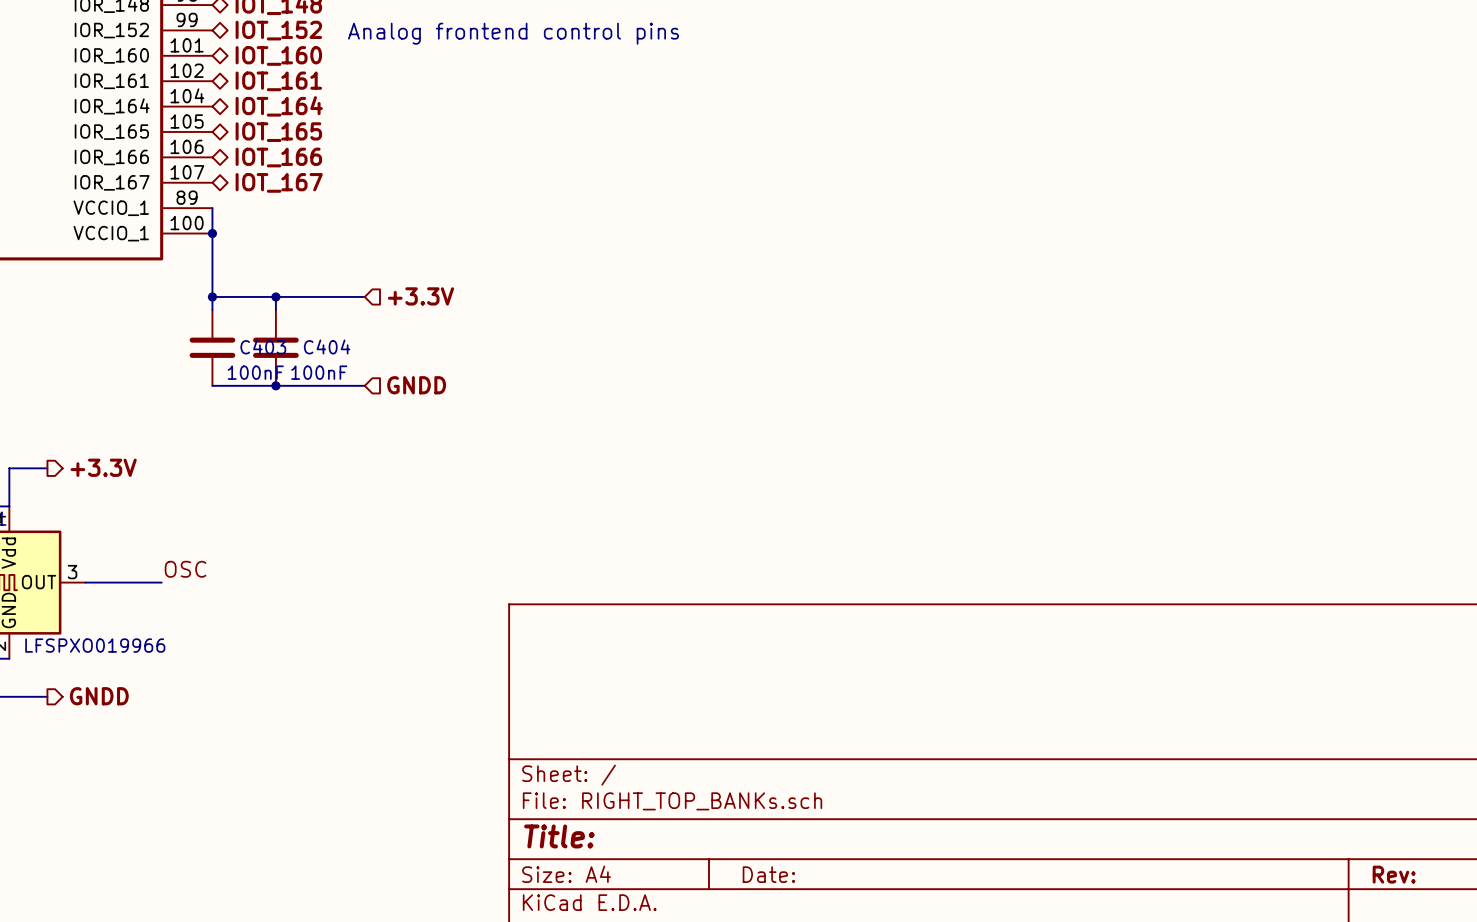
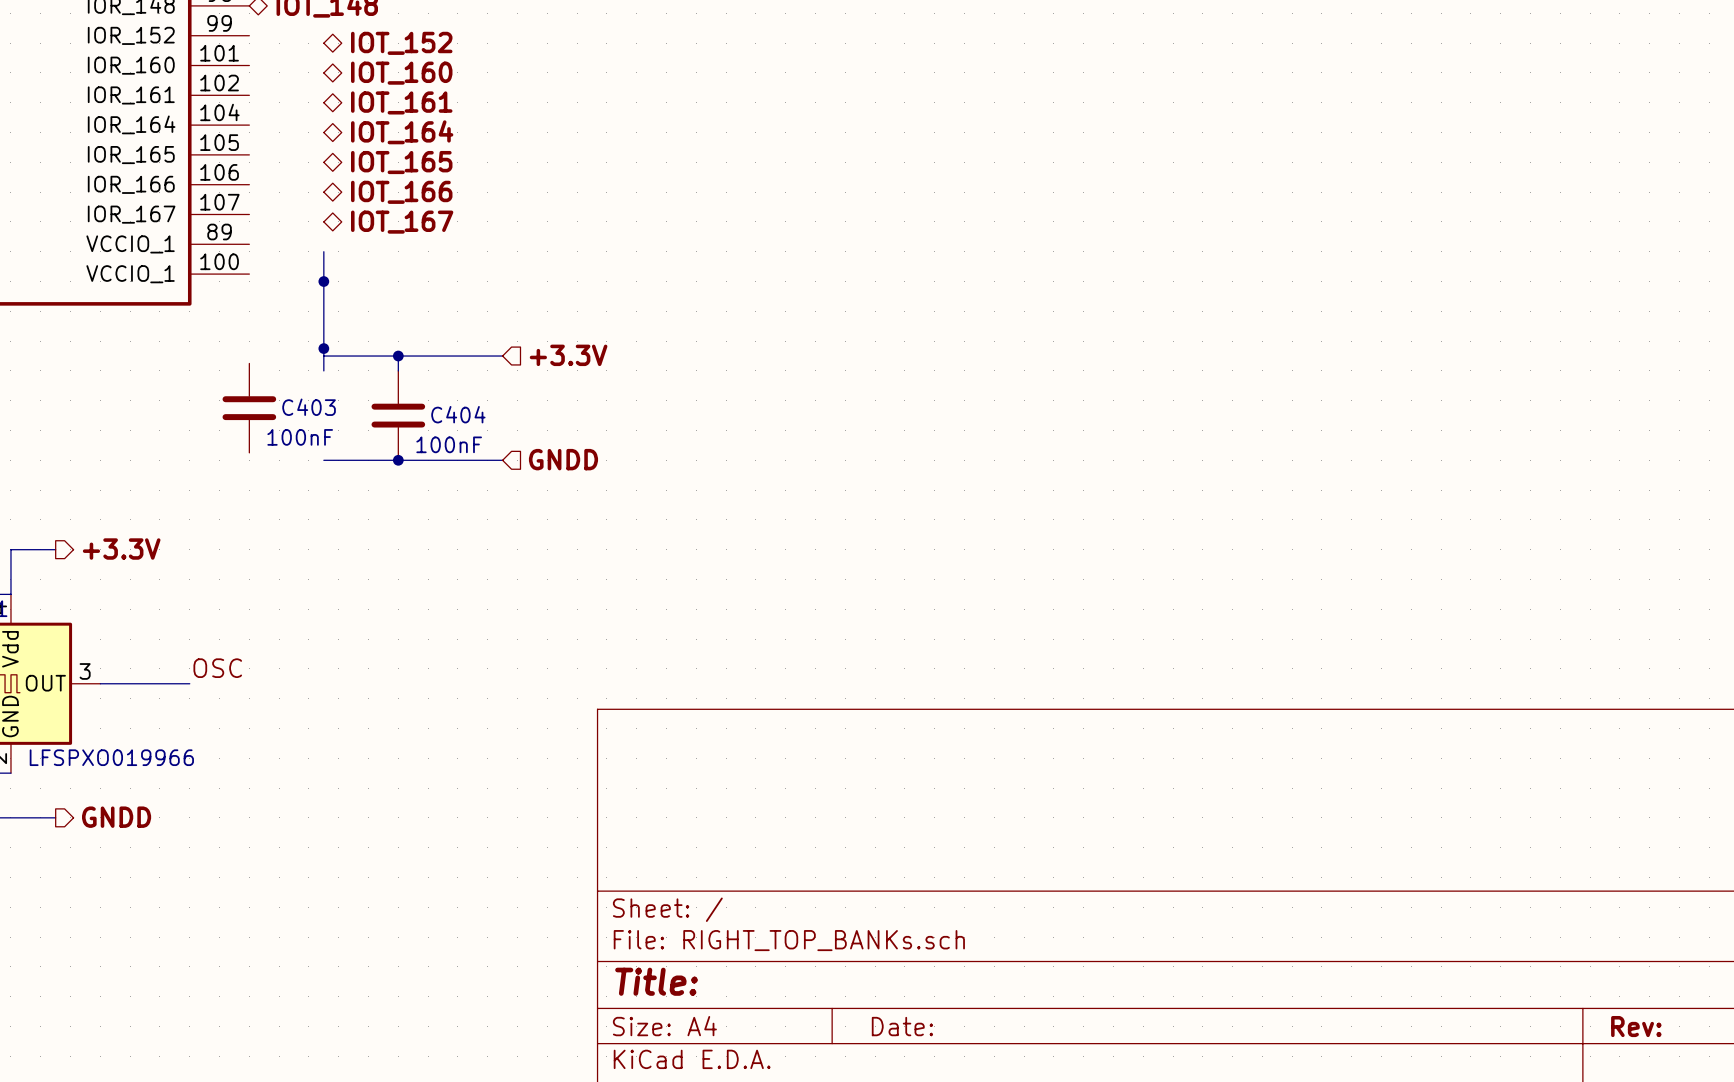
hierarchical label position: IOT_152 (278, 30) -> IOT_152 (401, 43)
text: Analog frontend control pins (513, 33) -> none
hierarchical label position: IOT_160 (278, 55) -> IOT_160 (401, 73)
hierarchical label position: IOT_161 (278, 81) -> IOT_161 (401, 102)
hierarchical label position: IOT_164 (279, 106) -> IOT_164 (402, 132)
hierarchical label position: IOT_165 (278, 132) -> IOT_165 (401, 162)
hierarchical label position: IOT_166 (278, 157) -> IOT_166 (401, 192)
hierarchical label position: IOT_167 (279, 182) -> IOT_167 (402, 222)
wire: (212, 208) (212, 309) -> none
wire: none -> (323, 251) (323, 348)
junction: (212, 233) -> none
junction: none -> (323, 281)
wire: (212, 296) (364, 296) -> (323, 356) (502, 356)
junction: (212, 296) -> none
hierarchical label position: +3.3V (420, 296) -> +3.3V (568, 355)
wire: none -> (398, 356) (398, 370)
junction: none -> (398, 356)
C404 position: (275, 347) -> (398, 415)
wire: (212, 385) (364, 385) -> (323, 460) (502, 460)
junction: (275, 385) -> none
hierarchical label position: GNDD (416, 385) -> GNDD (563, 459)
junction: none -> (398, 460)

